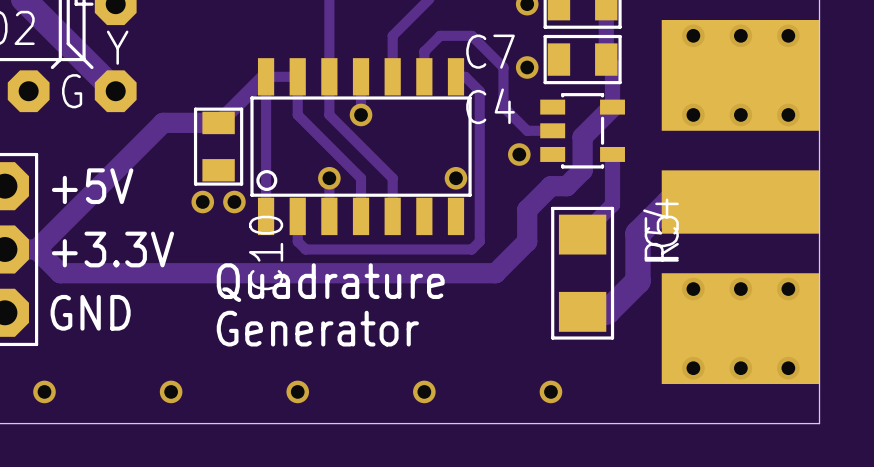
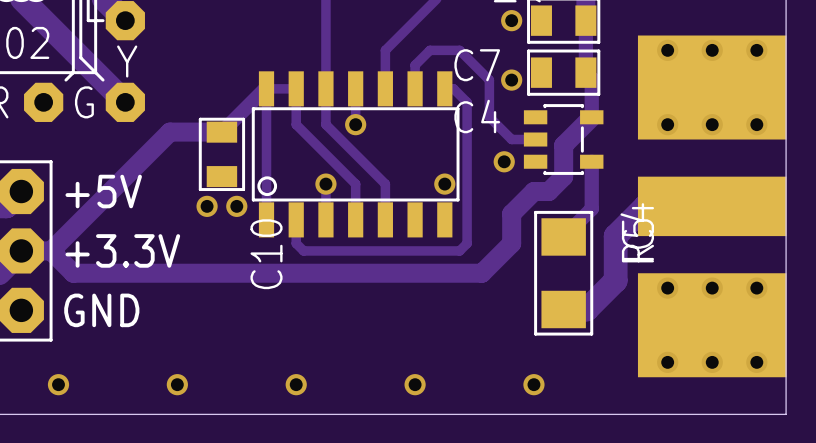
text: Quadrature (330, 282) -> none
text: Generator (317, 328) -> none

